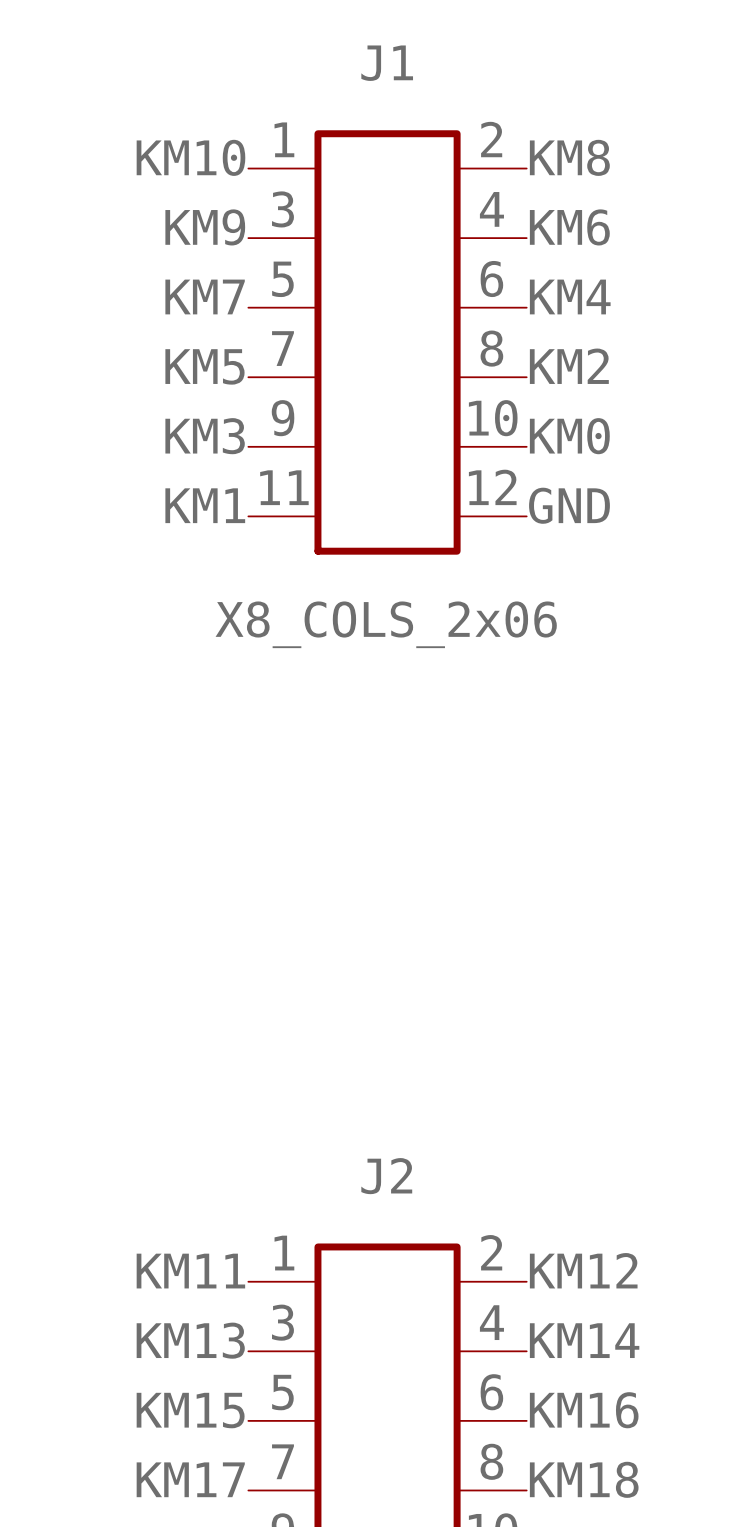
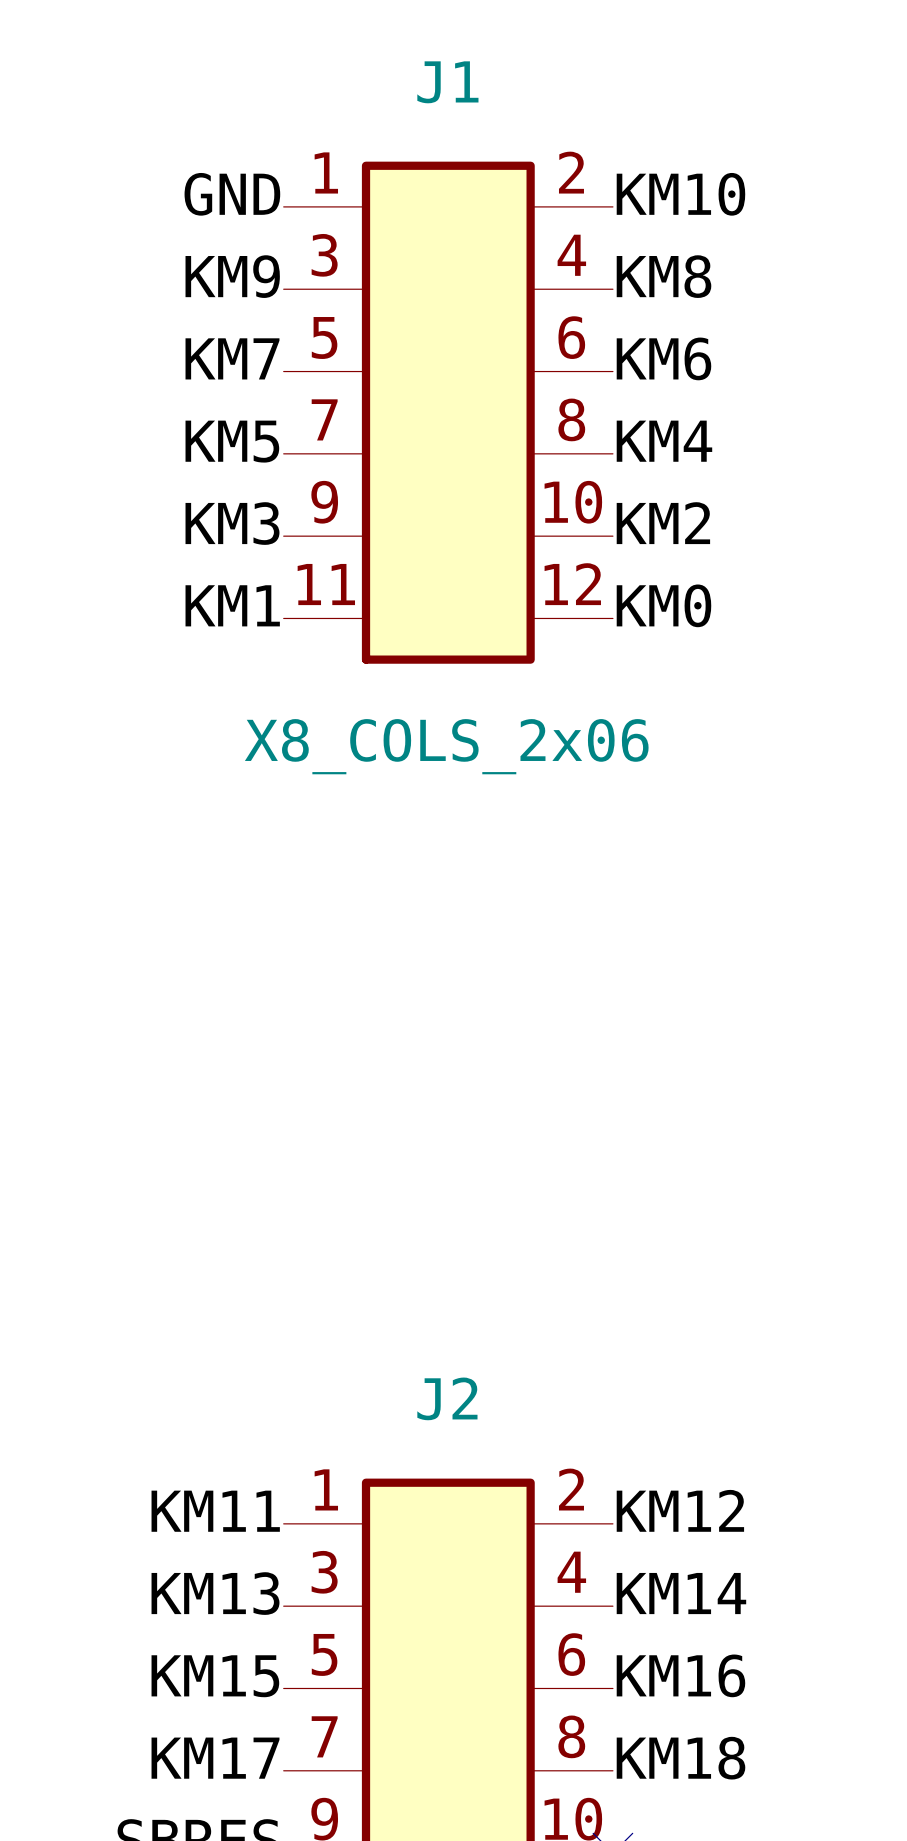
label: KM10 (190, 157) -> GND (232, 194)
label: KM8 (569, 157) -> KM10 (680, 194)
label: KM6 (569, 227) -> KM8 (664, 276)
label: KM4 (570, 296) -> KM6 (663, 358)
label: KM2 (569, 366) -> KM4 (664, 441)
label: KM0 (569, 436) -> KM2 (663, 523)
label: GND (569, 505) -> KM0 (663, 605)

